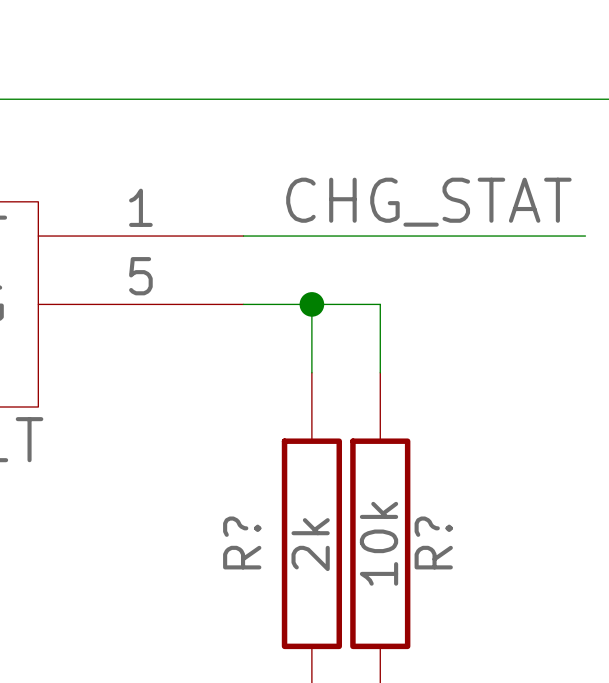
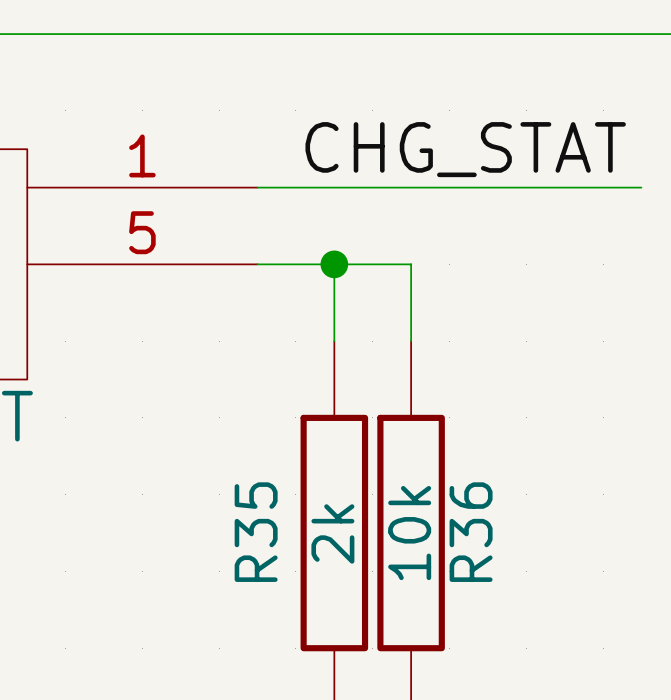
R? name: R? (242, 542) -> R35 (256, 532)
R? name: R? (433, 542) -> R36 (471, 532)

